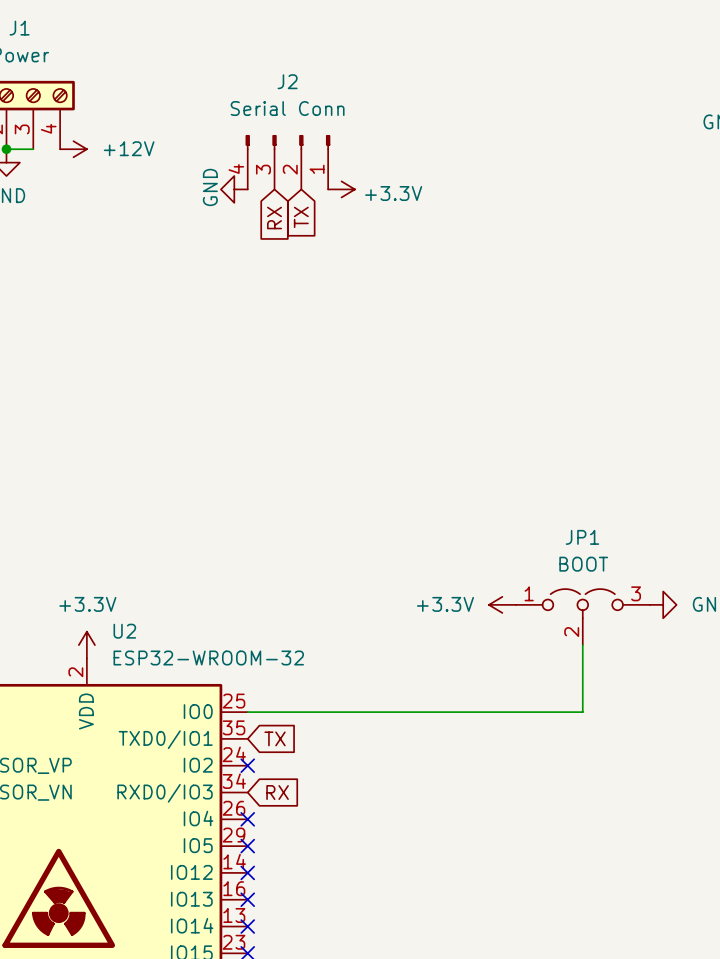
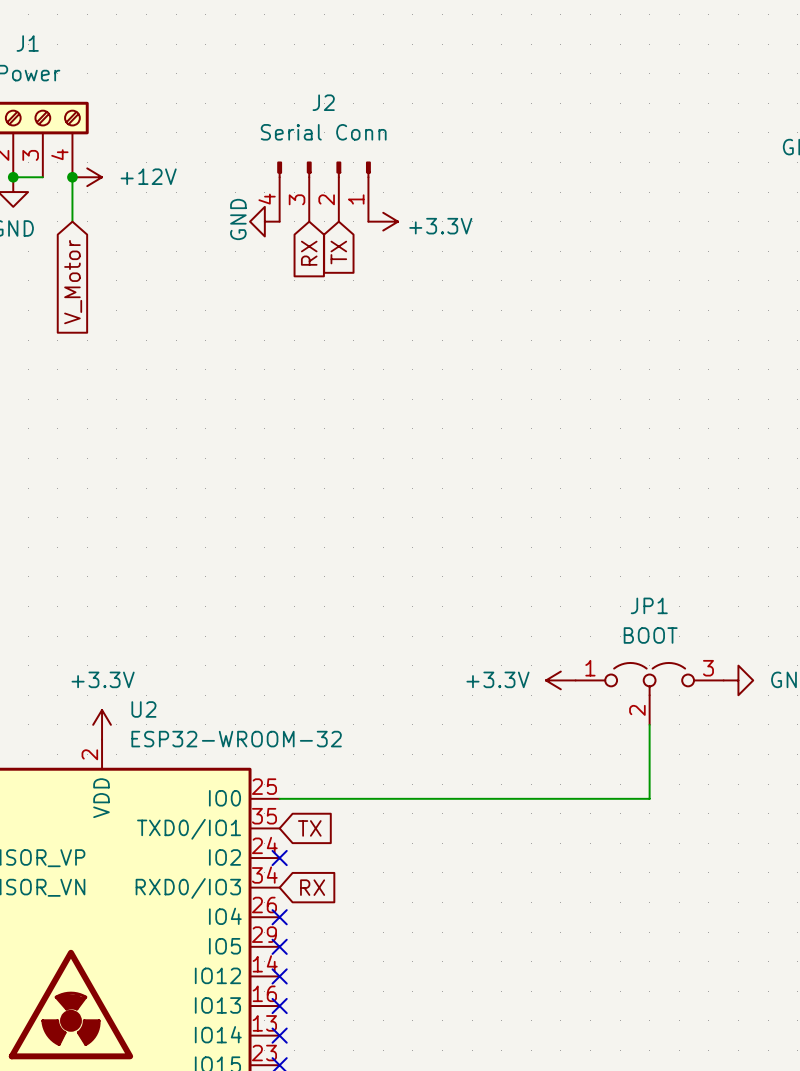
wire: none -> (72, 177) (72, 221)
junction: none -> (72, 177)
global label: none -> V_Motor (73, 282)

